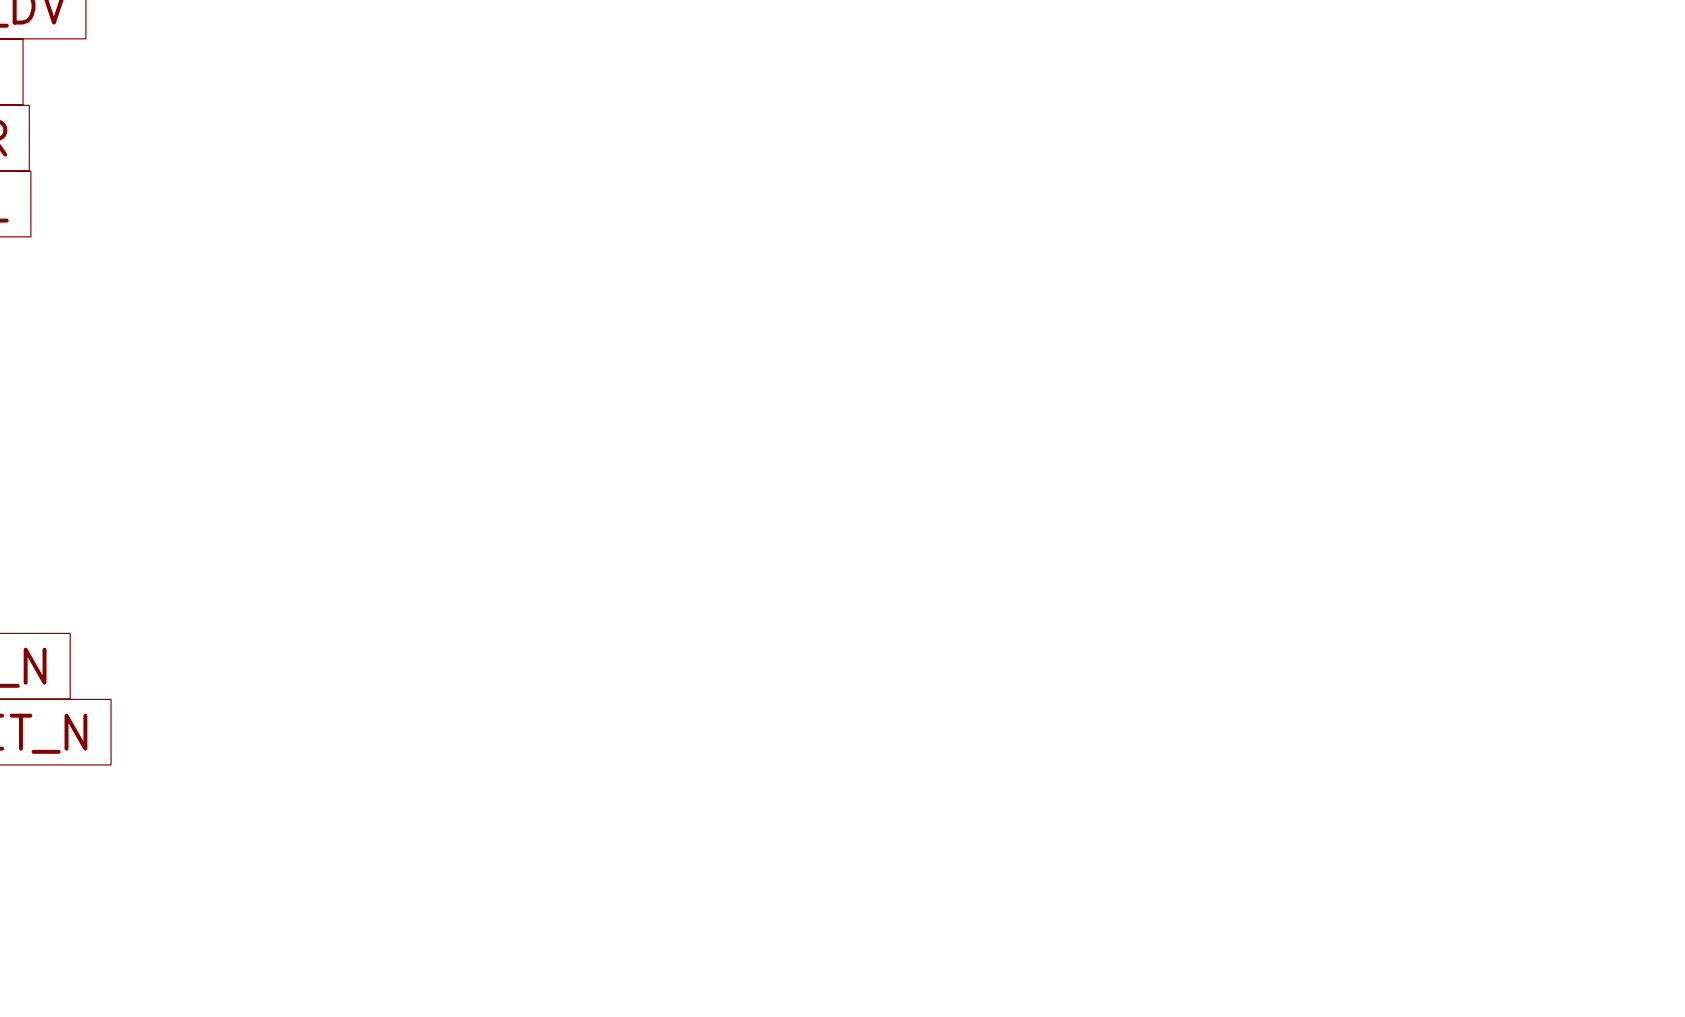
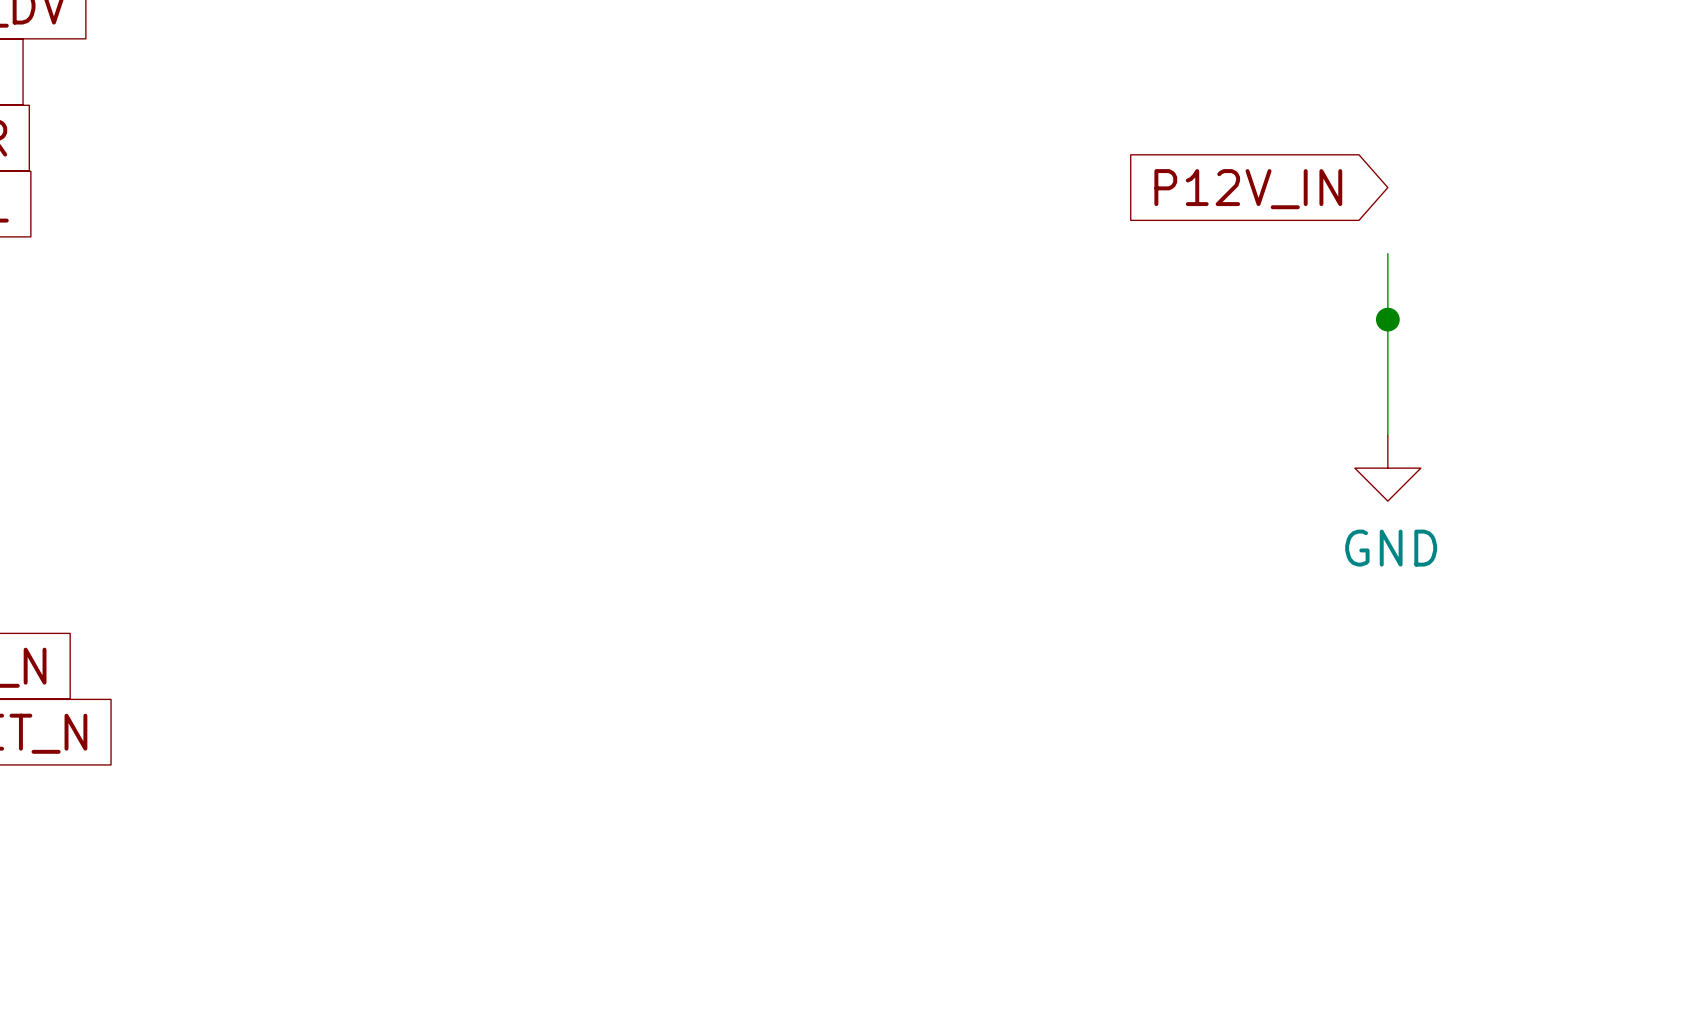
global label: none -> P12V_IN (1248, 189)
wire: none -> (1387, 253) (1387, 435)
junction: none -> (1387, 319)
power symbol: none -> GND (1387, 468)

